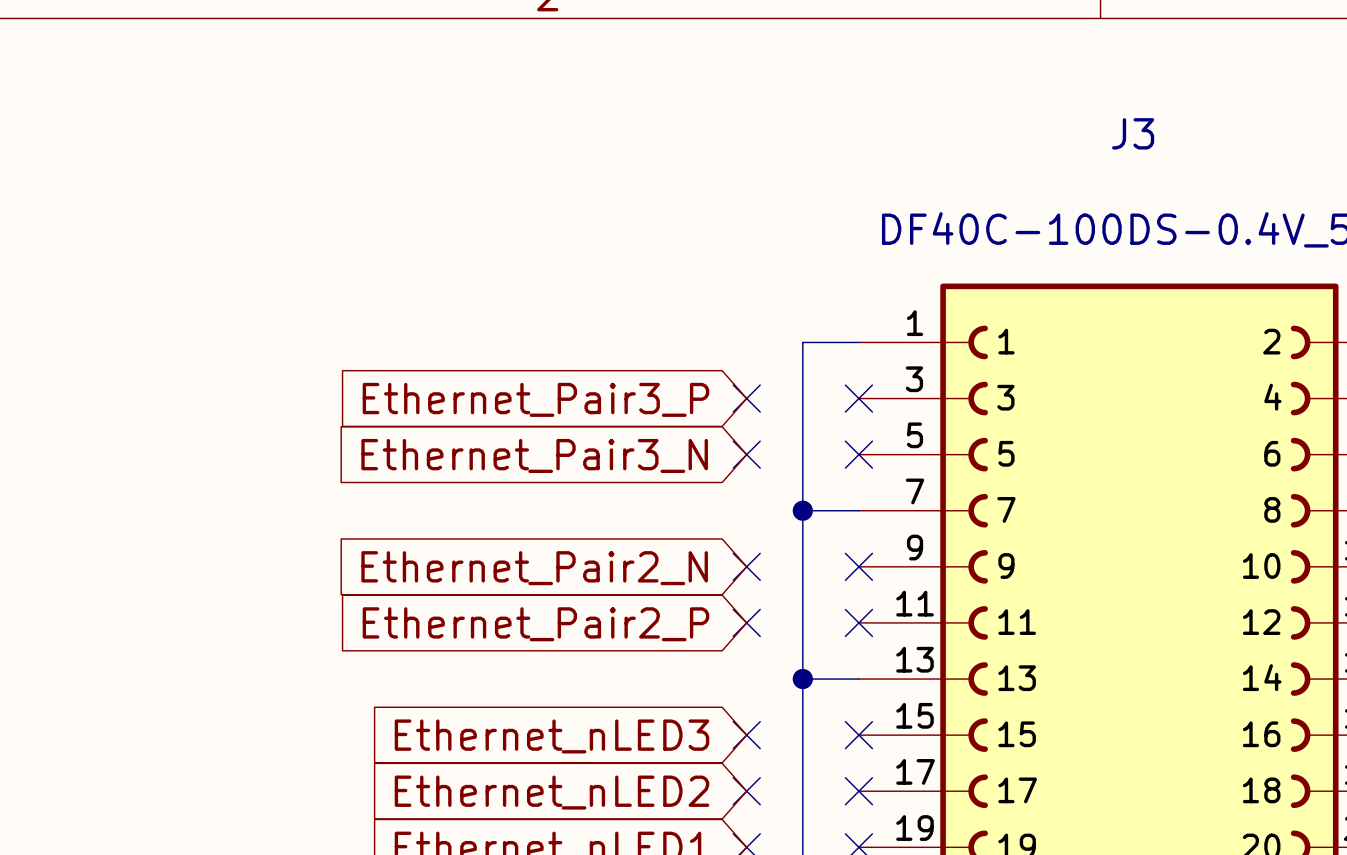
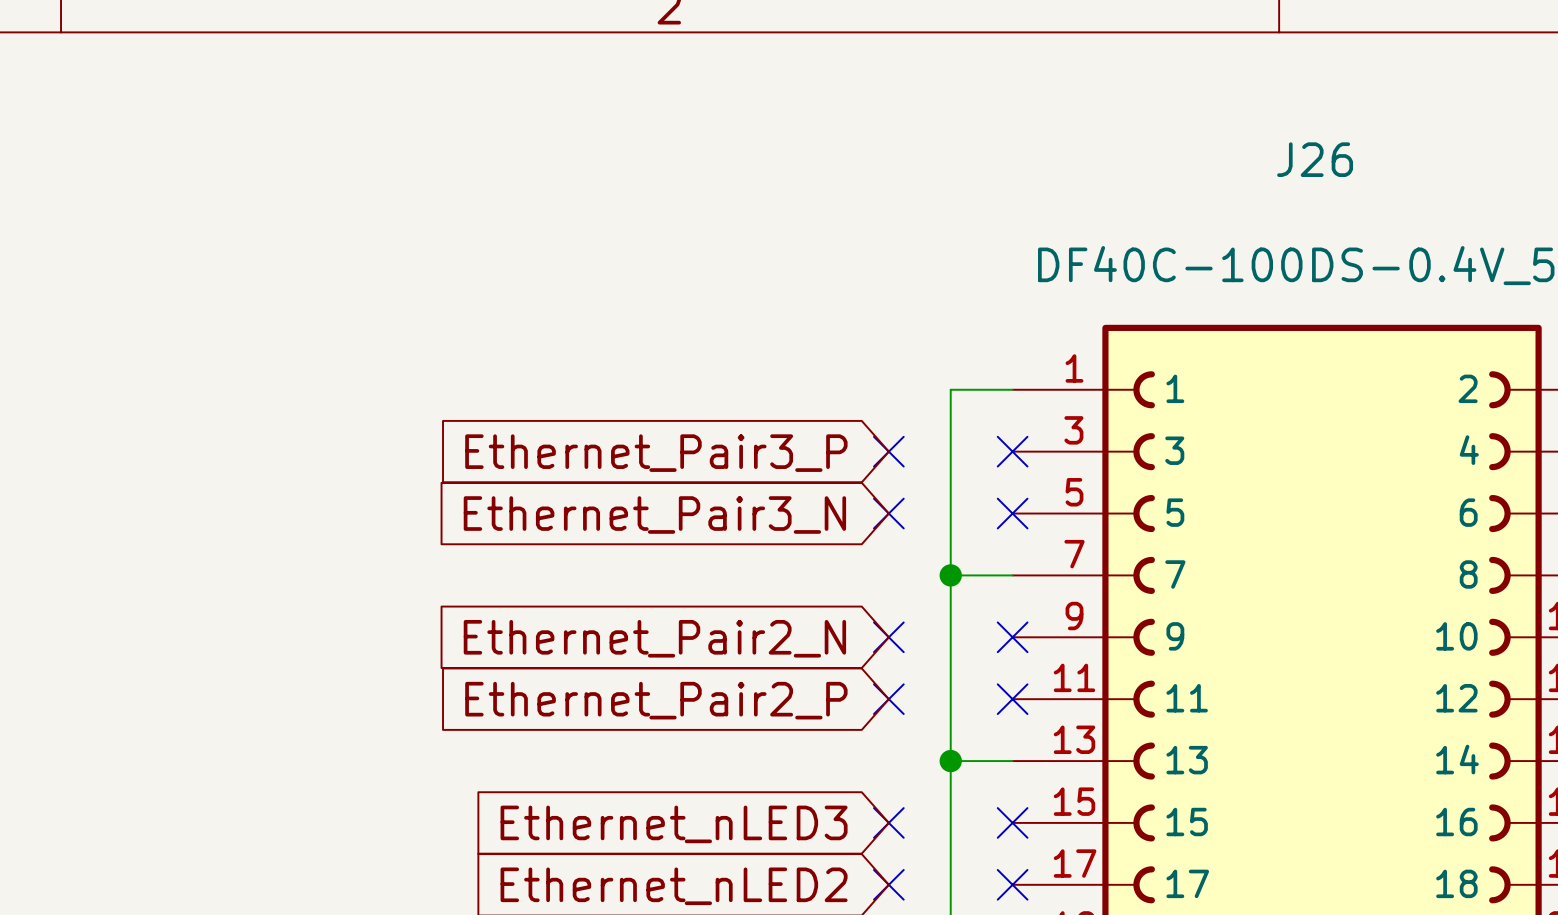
J3 name: J3 (1133, 133) -> J26 (1315, 159)

